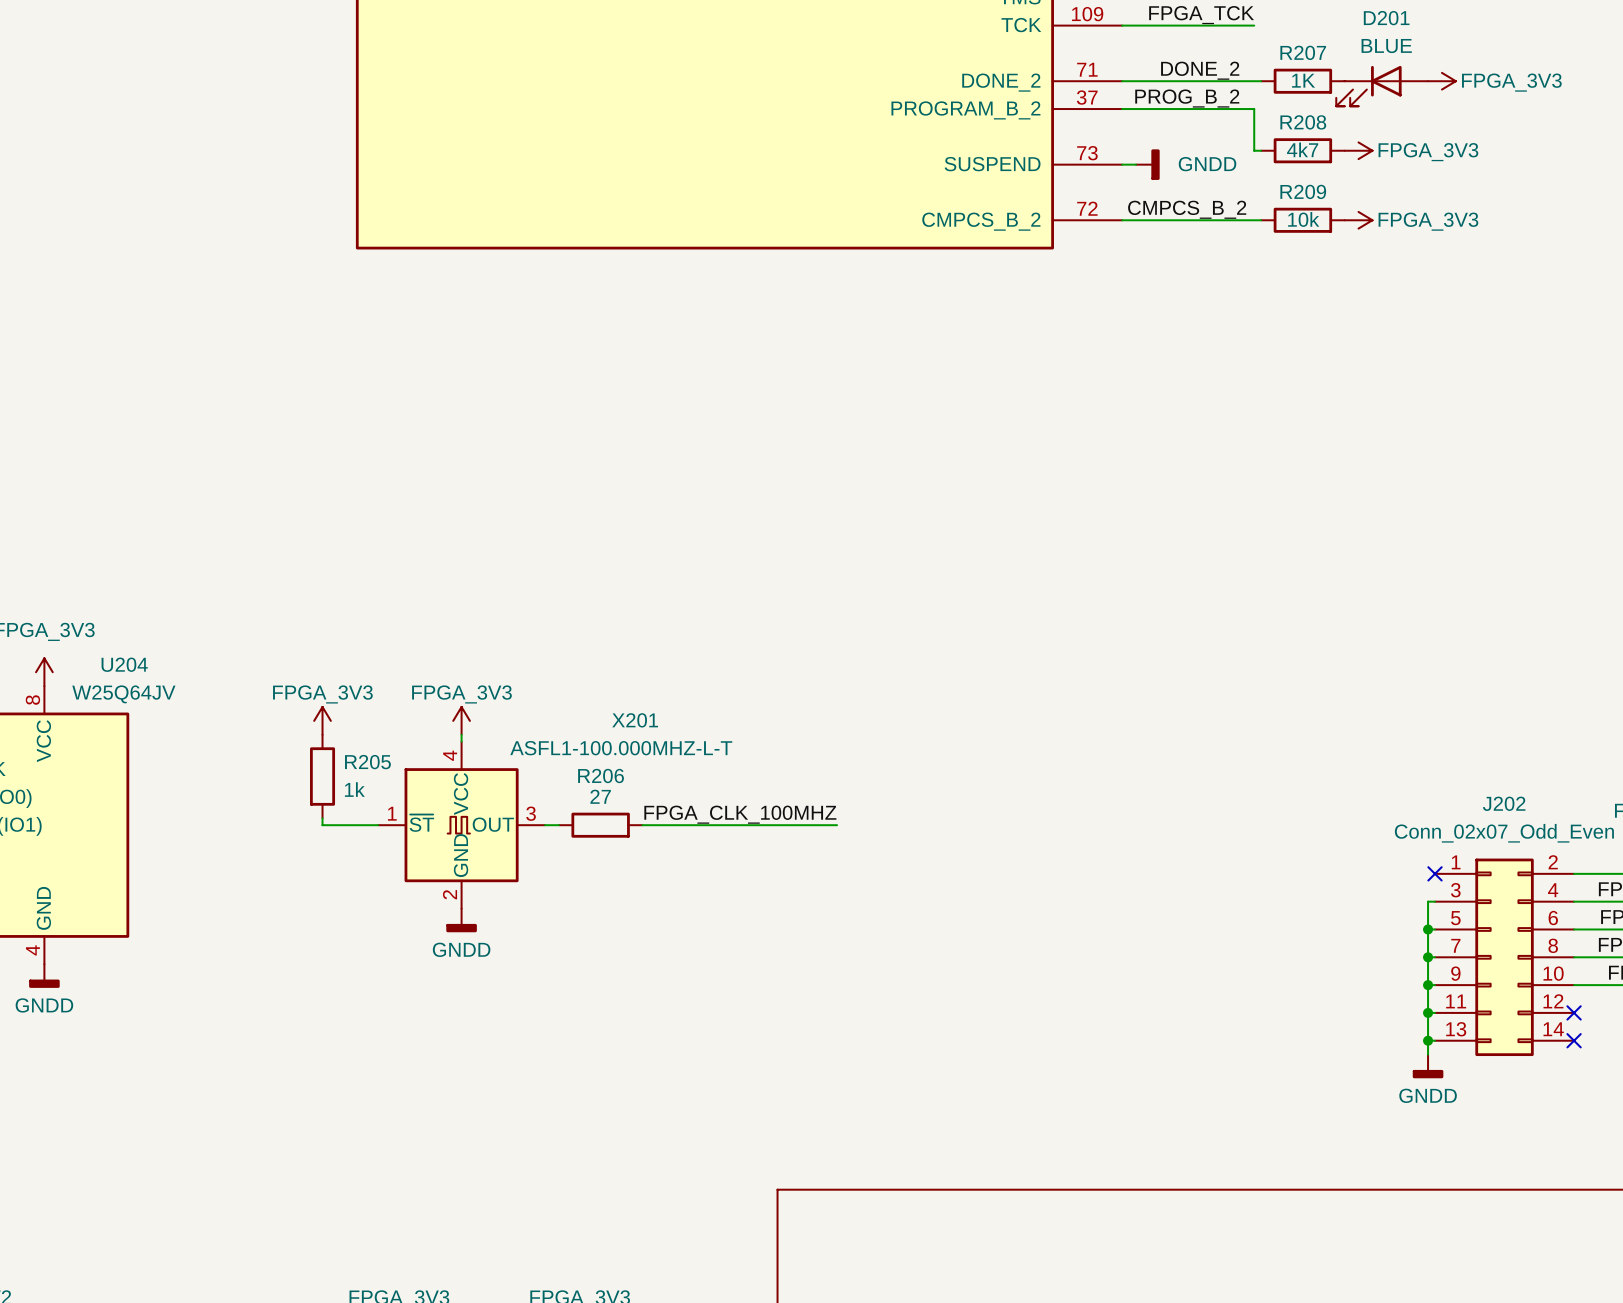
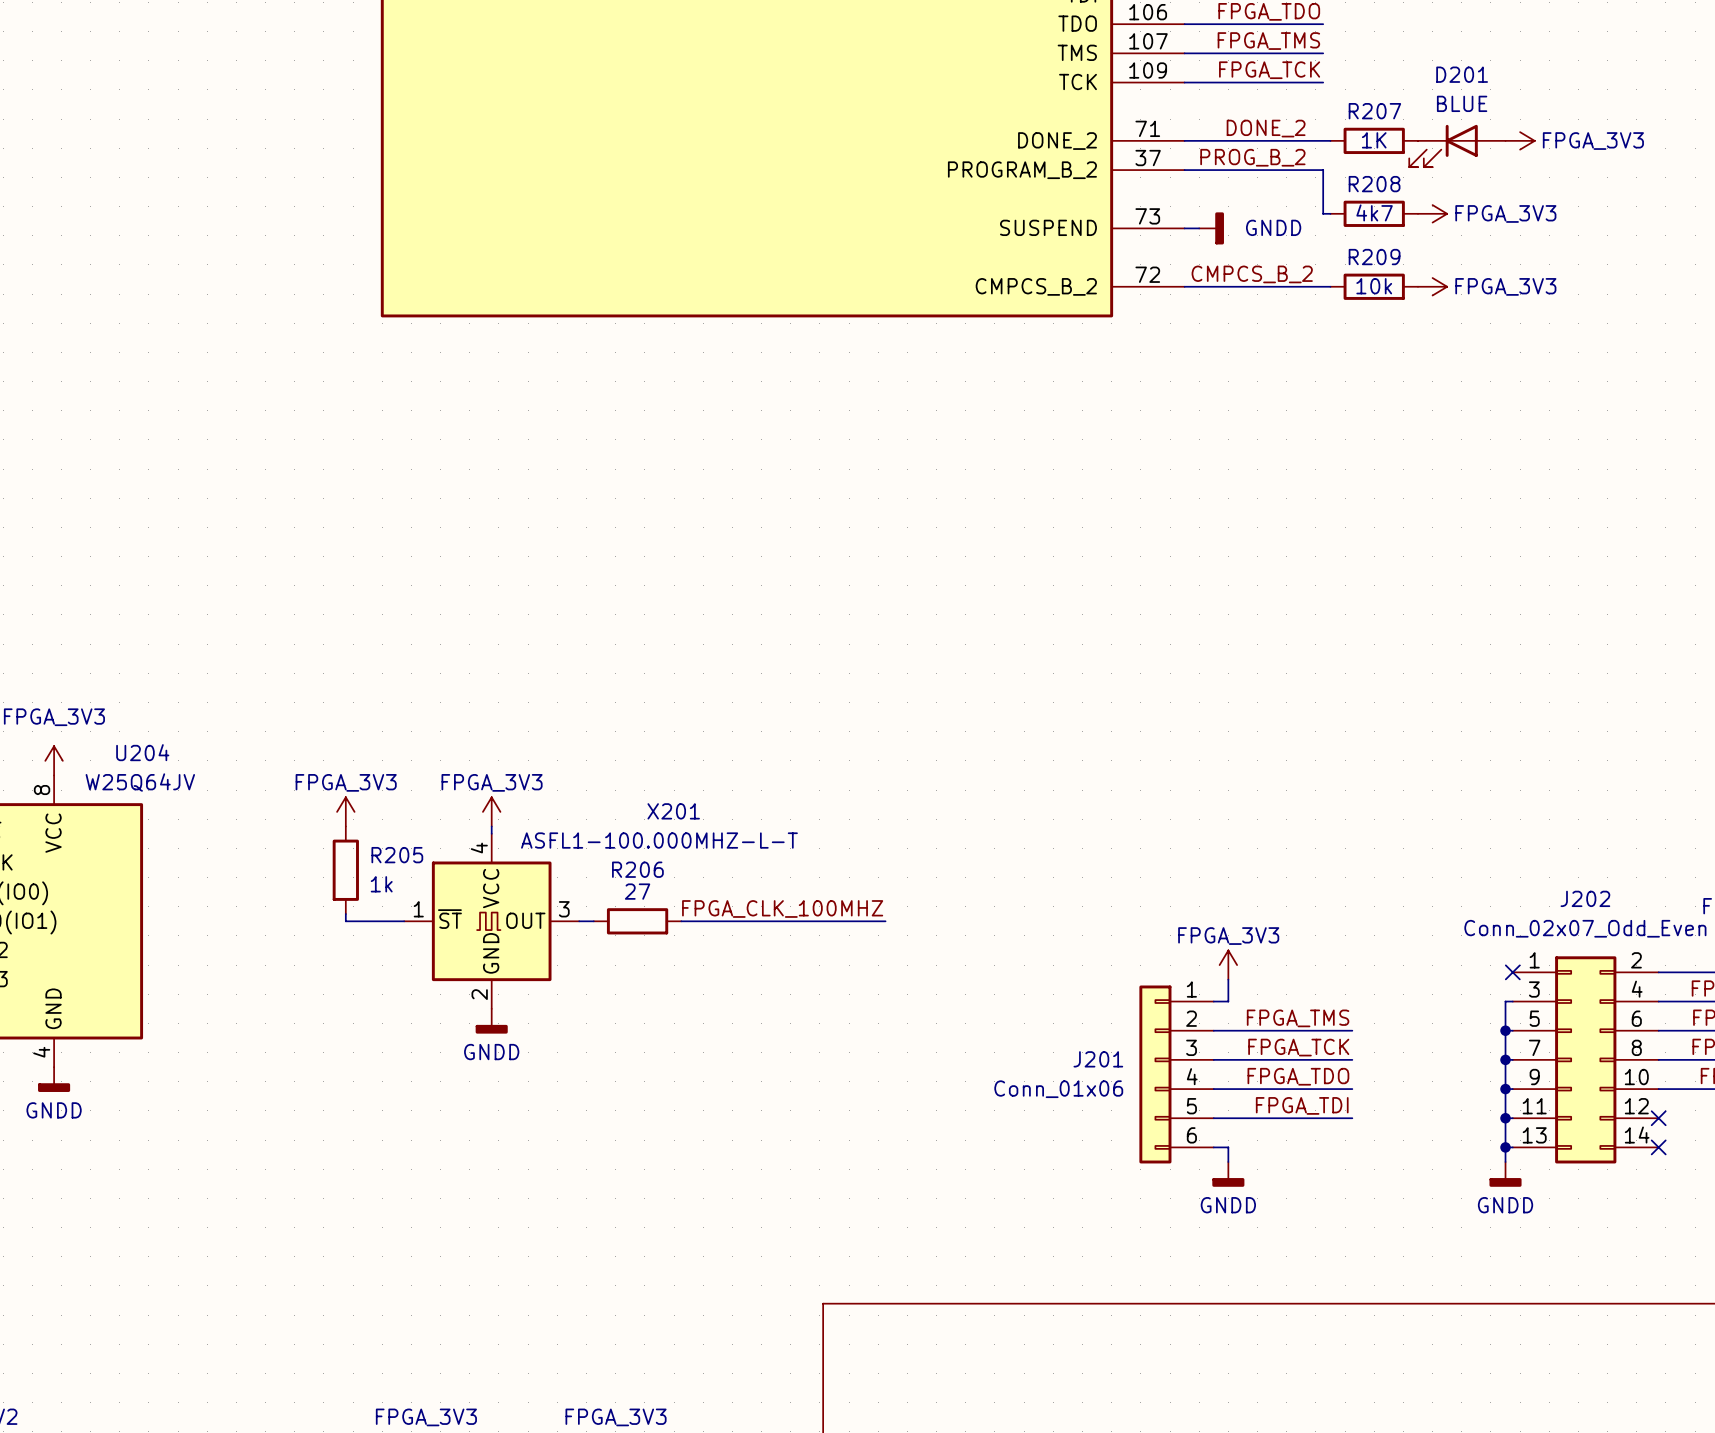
power symbol: none -> FPGA_3V3 (1228, 965)
wire: none -> (1228, 979) (1228, 1001) (1213, 1001)
label: none -> FPGA_TMS (1298, 1018)
wire: none -> (1213, 1030) (1352, 1030)
label: none -> FPGA_TCK (1298, 1047)
wire: none -> (1213, 1059) (1352, 1059)
J201: none -> Conn_01x06 (1176, 1074)
label: none -> FPGA_TDO (1298, 1076)
wire: none -> (1213, 1089) (1352, 1089)
label: none -> FPGA_TDI (1302, 1105)
wire: none -> (1213, 1118) (1352, 1118)
wire: none -> (1213, 1147) (1228, 1147) (1228, 1162)
power symbol: none -> GNDD (1228, 1174)

